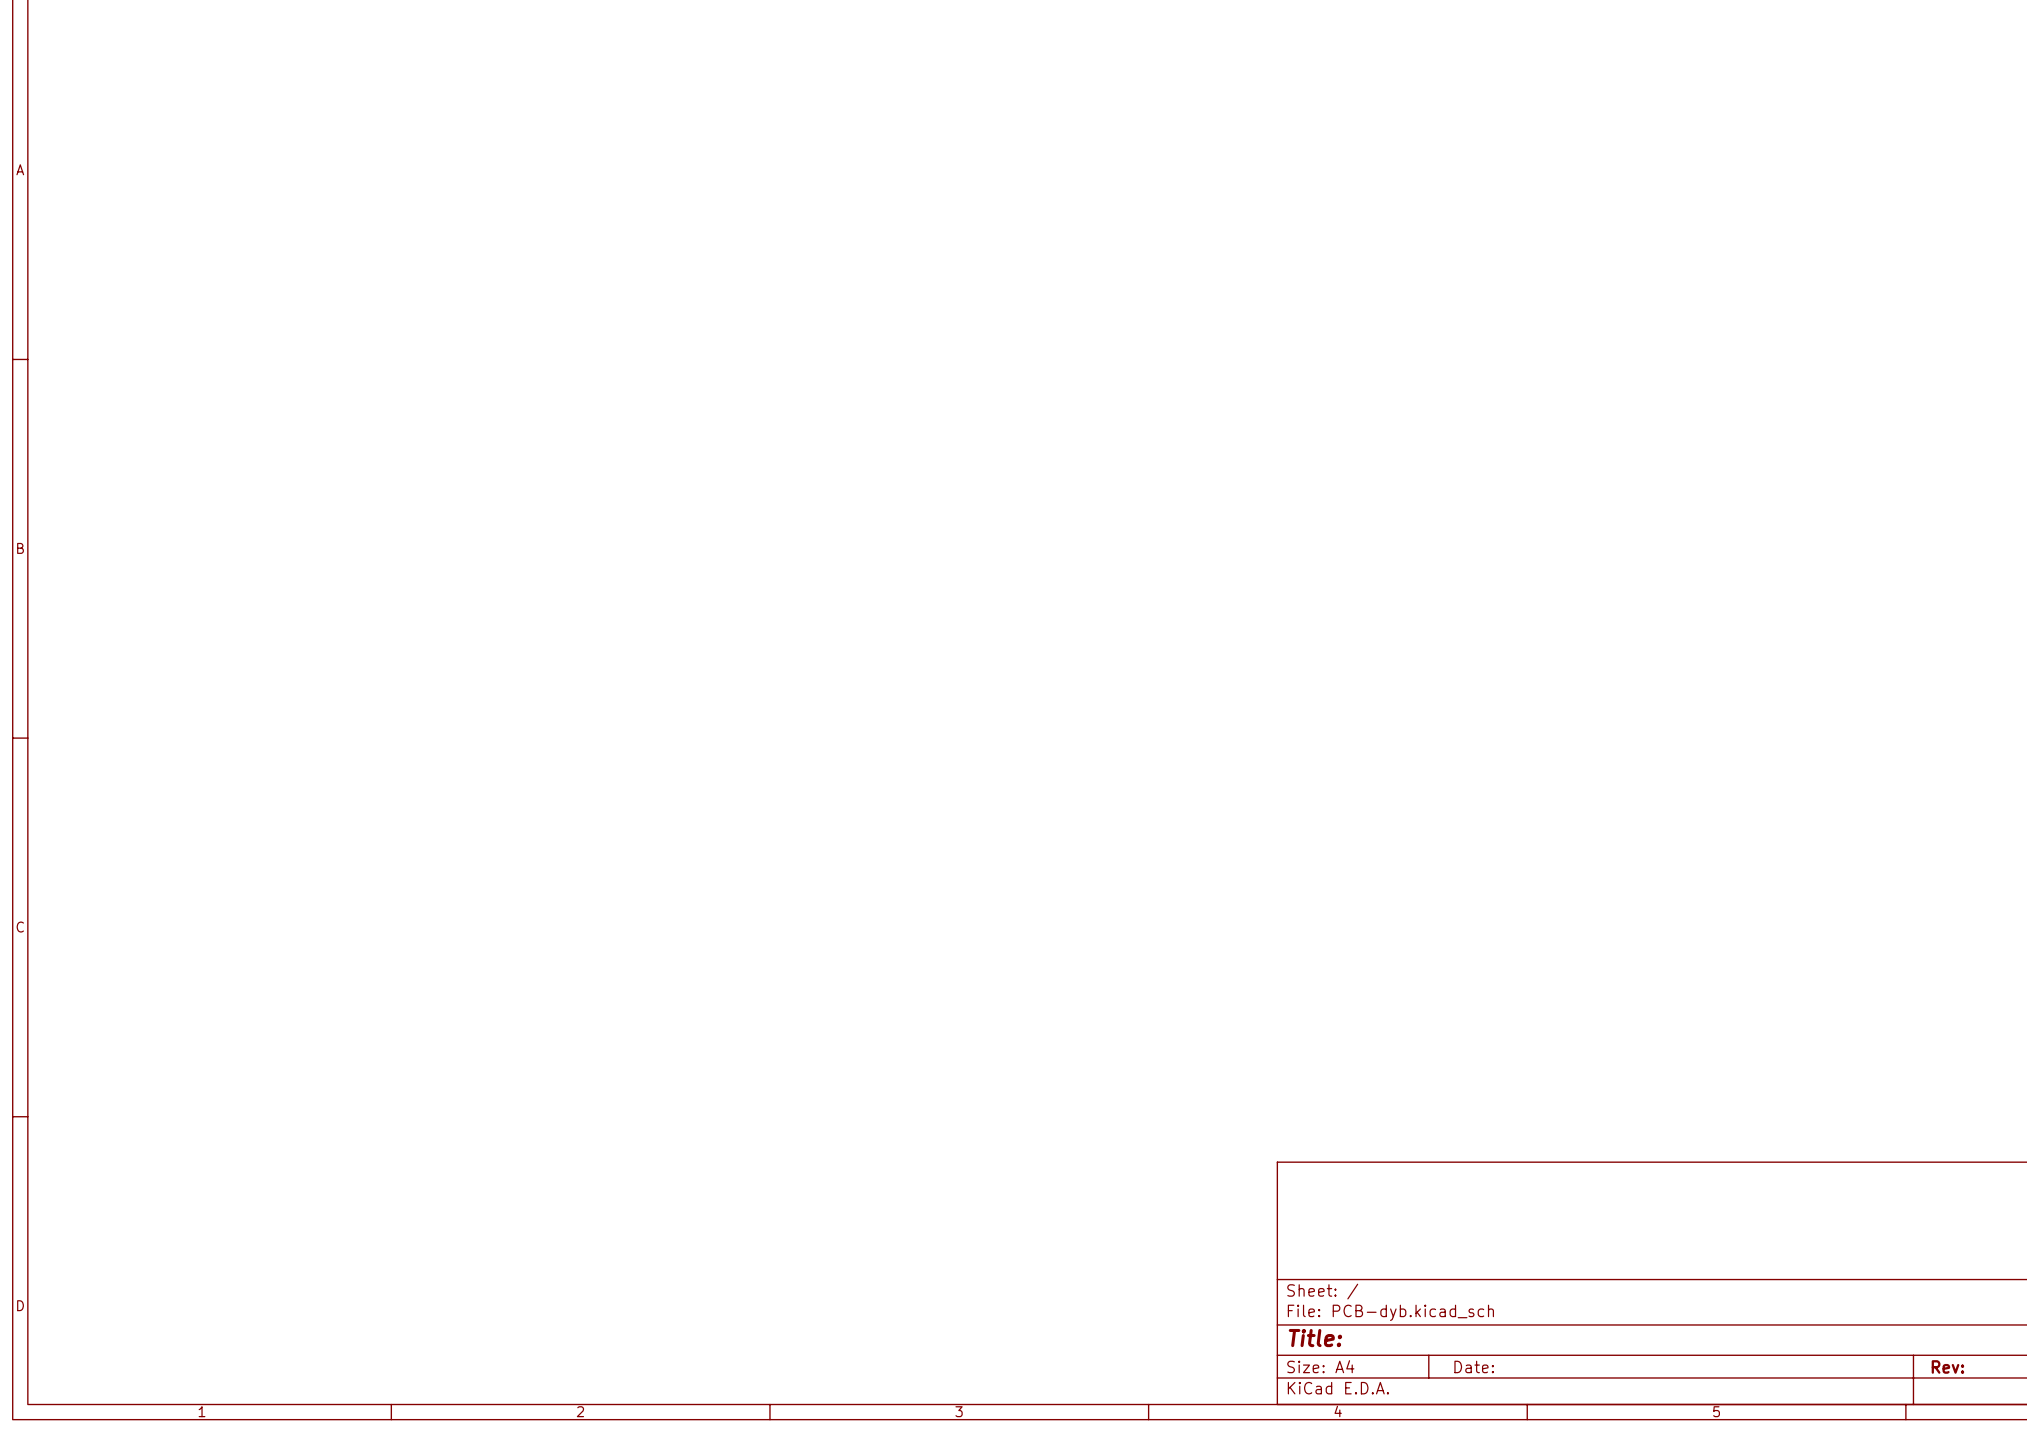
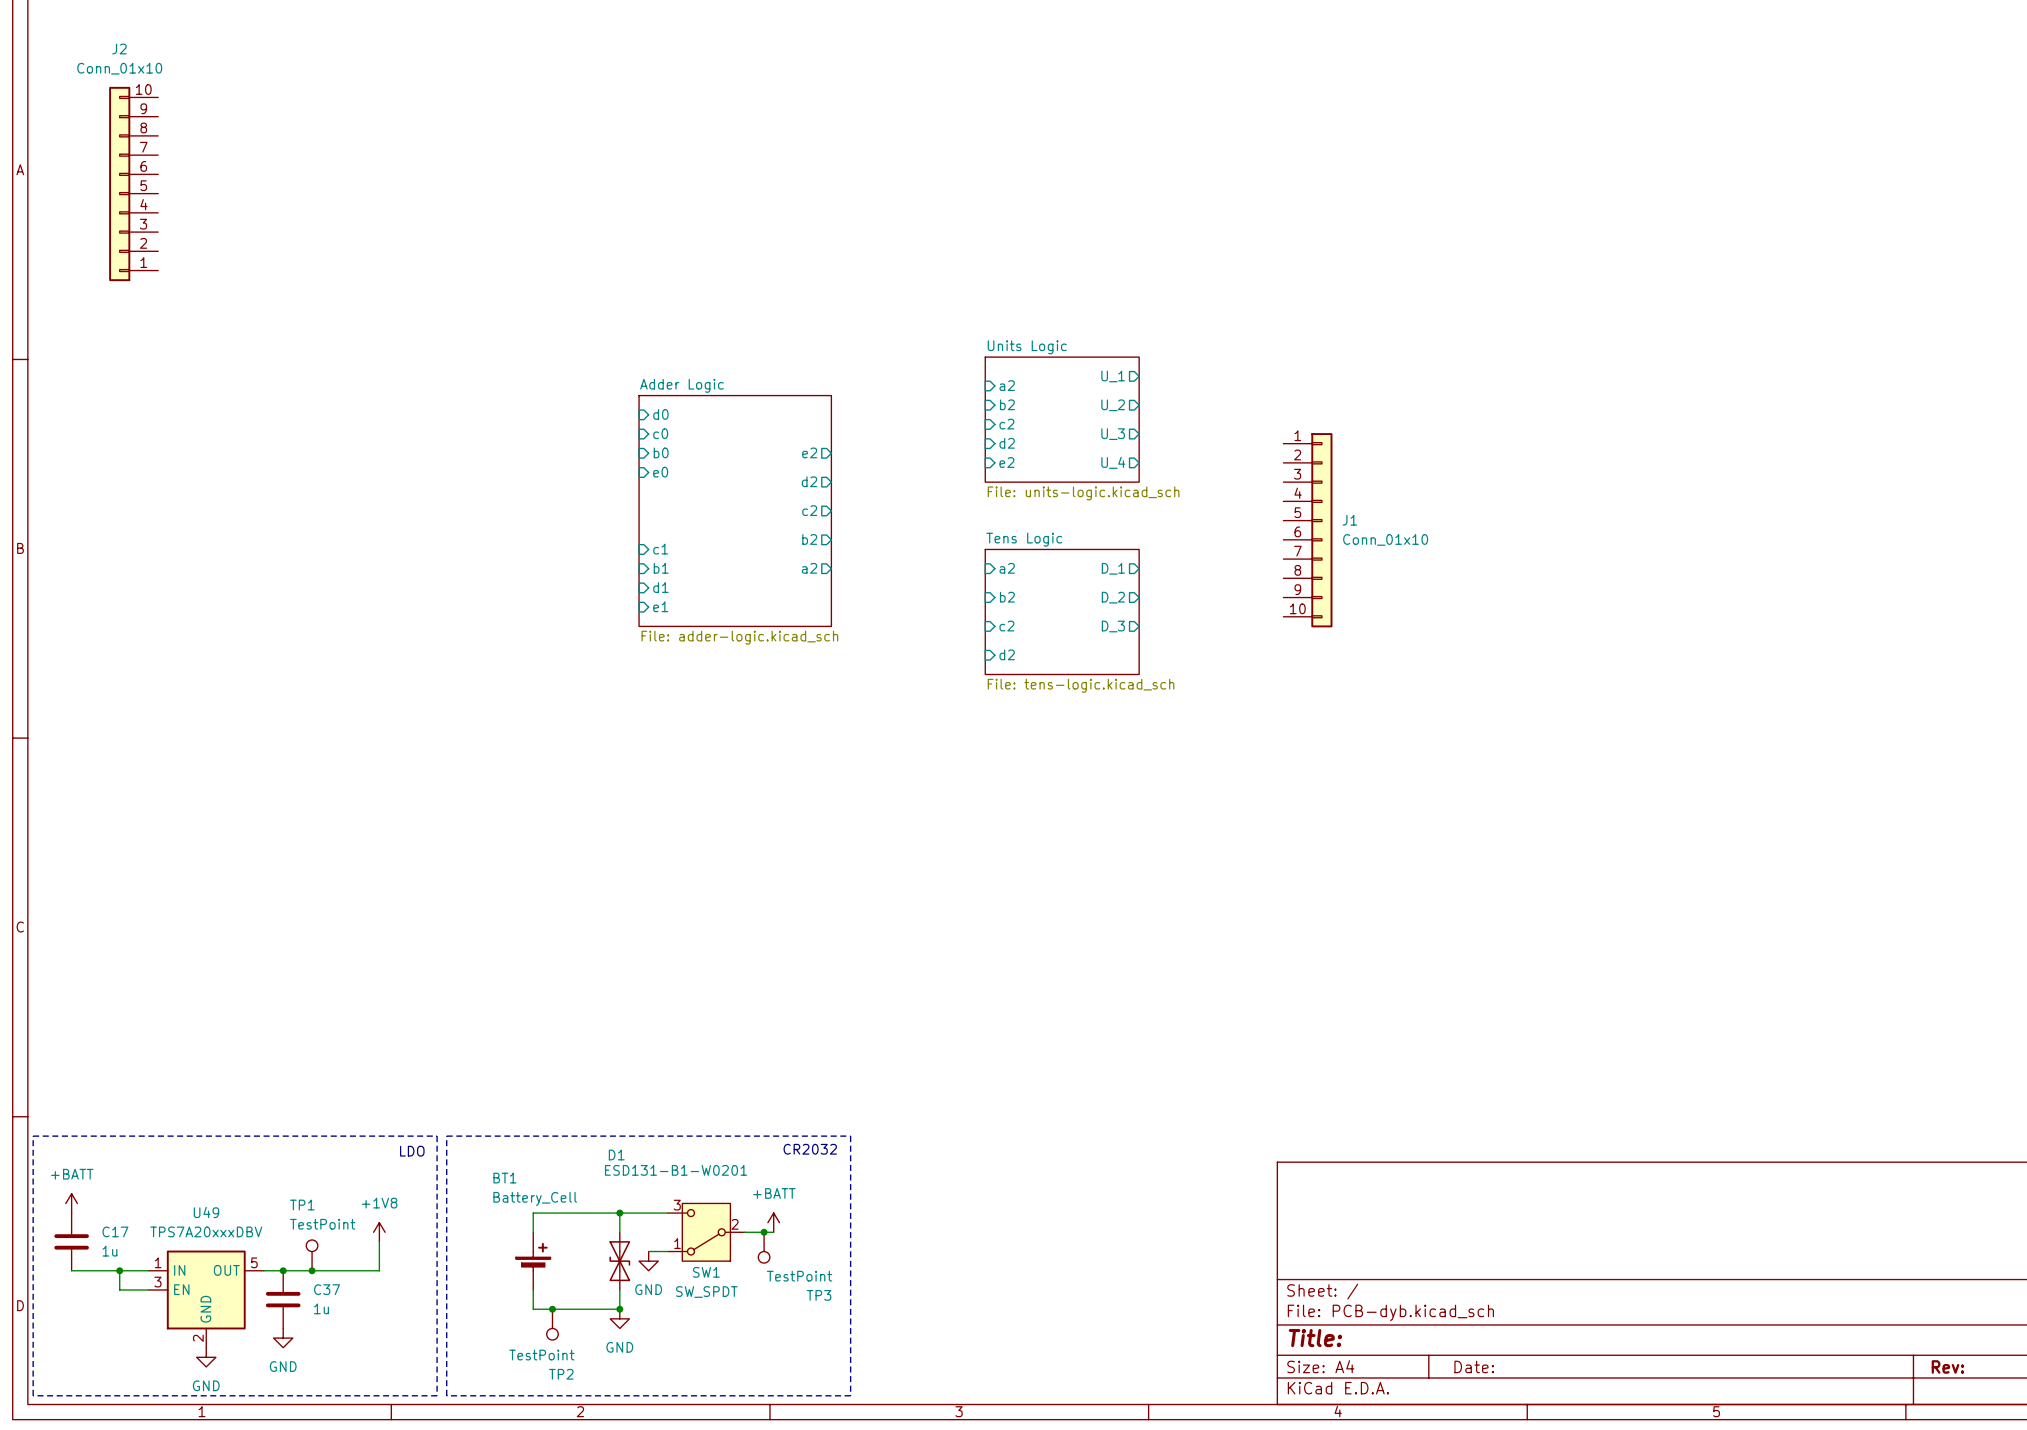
J2: none -> Conn_01x10 (133, 184)
sheet pin: none -> U_1 (1113, 376)
sheet pin: none -> a2 (1007, 385)
sheet pin: none -> b2 (1007, 404)
sheet pin: none -> U_2 (1113, 405)
sheet pin: none -> d0 (660, 414)
sheet Units Logic: none -> File: units-logic.kicad_sch (1062, 419)
sheet pin: none -> c2 (1006, 424)
sheet pin: none -> c0 (660, 433)
sheet pin: none -> U_3 (1113, 434)
sheet pin: none -> d2 (1007, 443)
sheet pin: none -> b0 (661, 452)
sheet pin: none -> e2 (809, 452)
sheet pin: none -> e2 (1006, 462)
sheet pin: none -> U_4 (1113, 462)
sheet pin: none -> e0 (660, 472)
sheet pin: none -> d2 (809, 481)
sheet Adder Logic: none -> File: adder-logic.kicad_sch (735, 510)
sheet pin: none -> c2 (809, 510)
J1: none -> Conn_01x10 (1307, 530)
sheet pin: none -> b2 (809, 539)
sheet pin: none -> c1 (660, 549)
sheet pin: none -> b1 (661, 568)
sheet pin: none -> a2 (809, 568)
sheet pin: none -> a2 (1007, 568)
sheet pin: none -> D_1 (1113, 568)
sheet pin: none -> d1 (660, 587)
sheet pin: none -> b2 (1007, 597)
sheet pin: none -> D_2 (1113, 597)
sheet pin: none -> e1 (660, 606)
sheet Tens Logic: none -> File: tens-logic.kicad_sch (1062, 611)
sheet pin: none -> c2 (1006, 626)
sheet pin: none -> D_3 (1113, 626)
sheet pin: none -> d2 (1007, 654)
line: none -> (33, 1136) (437, 1136) (437, 1395) (33, 1395) (33, 1136)
line: none -> (446, 1136) (850, 1136) (850, 1395) (446, 1395) (446, 1136)
text: none -> CR2032 (810, 1149)
text: none -> LDO (412, 1151)
power symbol: none -> +BATT (71, 1203)
wire: none -> (619, 1213) (619, 1232)
junction: none -> (619, 1213)
wire: none -> (667, 1213) (533, 1213) (533, 1232)
power symbol: none -> +BATT (773, 1222)
power symbol: none -> +1V8 (379, 1232)
SW1: none -> SW_SPDT (706, 1232)
wire: none -> (744, 1232) (773, 1232)
junction: none -> (764, 1232)
C17: none -> 1u (71, 1241)
wire: none -> (379, 1241) (379, 1270) (263, 1270)
TP3: none -> TestPoint (764, 1247)
wire: none -> (648, 1251) (667, 1251)
TP1: none -> TestPoint (312, 1255)
BT1: none -> Battery_Cell (533, 1261)
D1: none -> ESD131-B1-W0201 (619, 1261)
power symbol: none -> GND (648, 1261)
wire: none -> (71, 1270) (148, 1270)
wire: none -> (119, 1270) (119, 1290) (148, 1290)
junction: none -> (119, 1270)
junction: none -> (283, 1270)
junction: none -> (312, 1270)
wire: none -> (533, 1290) (533, 1309) (619, 1309) (619, 1290)
U49: none -> TPS7A20xxxDBV (206, 1299)
C37: none -> 1u (283, 1299)
junction: none -> (552, 1309)
junction: none -> (619, 1309)
power symbol: none -> GND (619, 1318)
TP2: none -> TestPoint (552, 1324)
power symbol: none -> GND (283, 1338)
power symbol: none -> GND (206, 1357)

